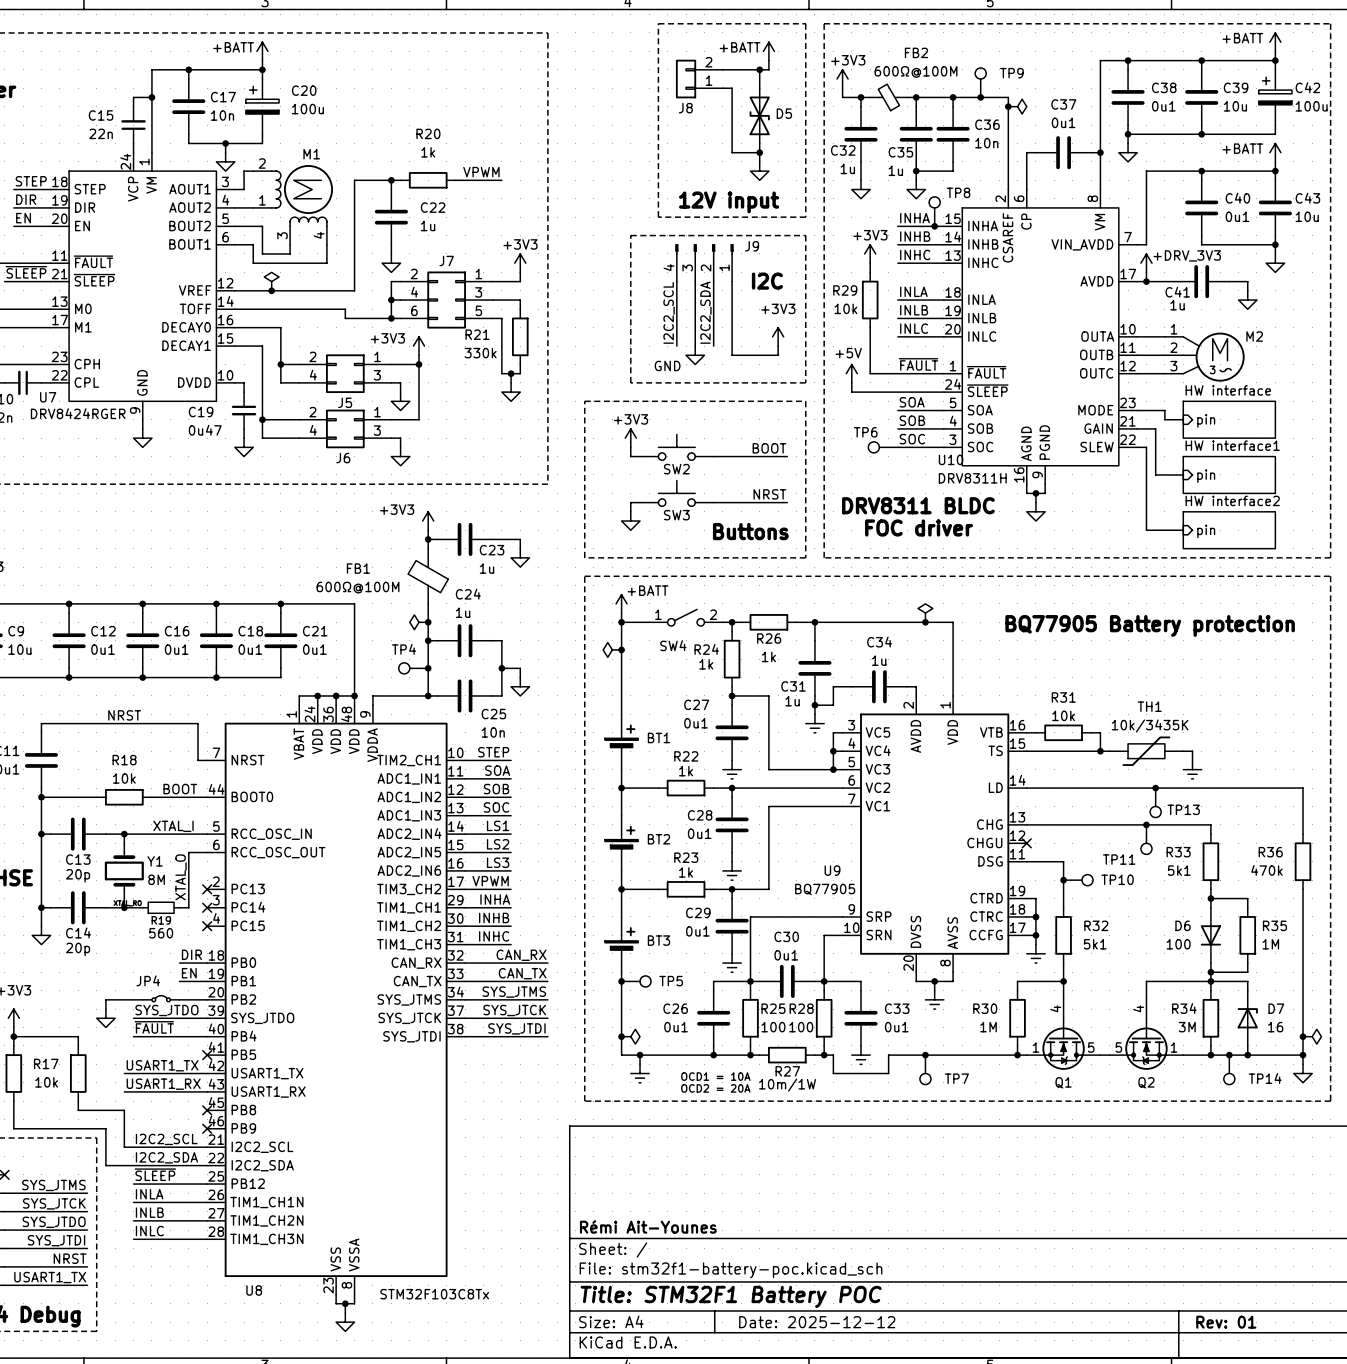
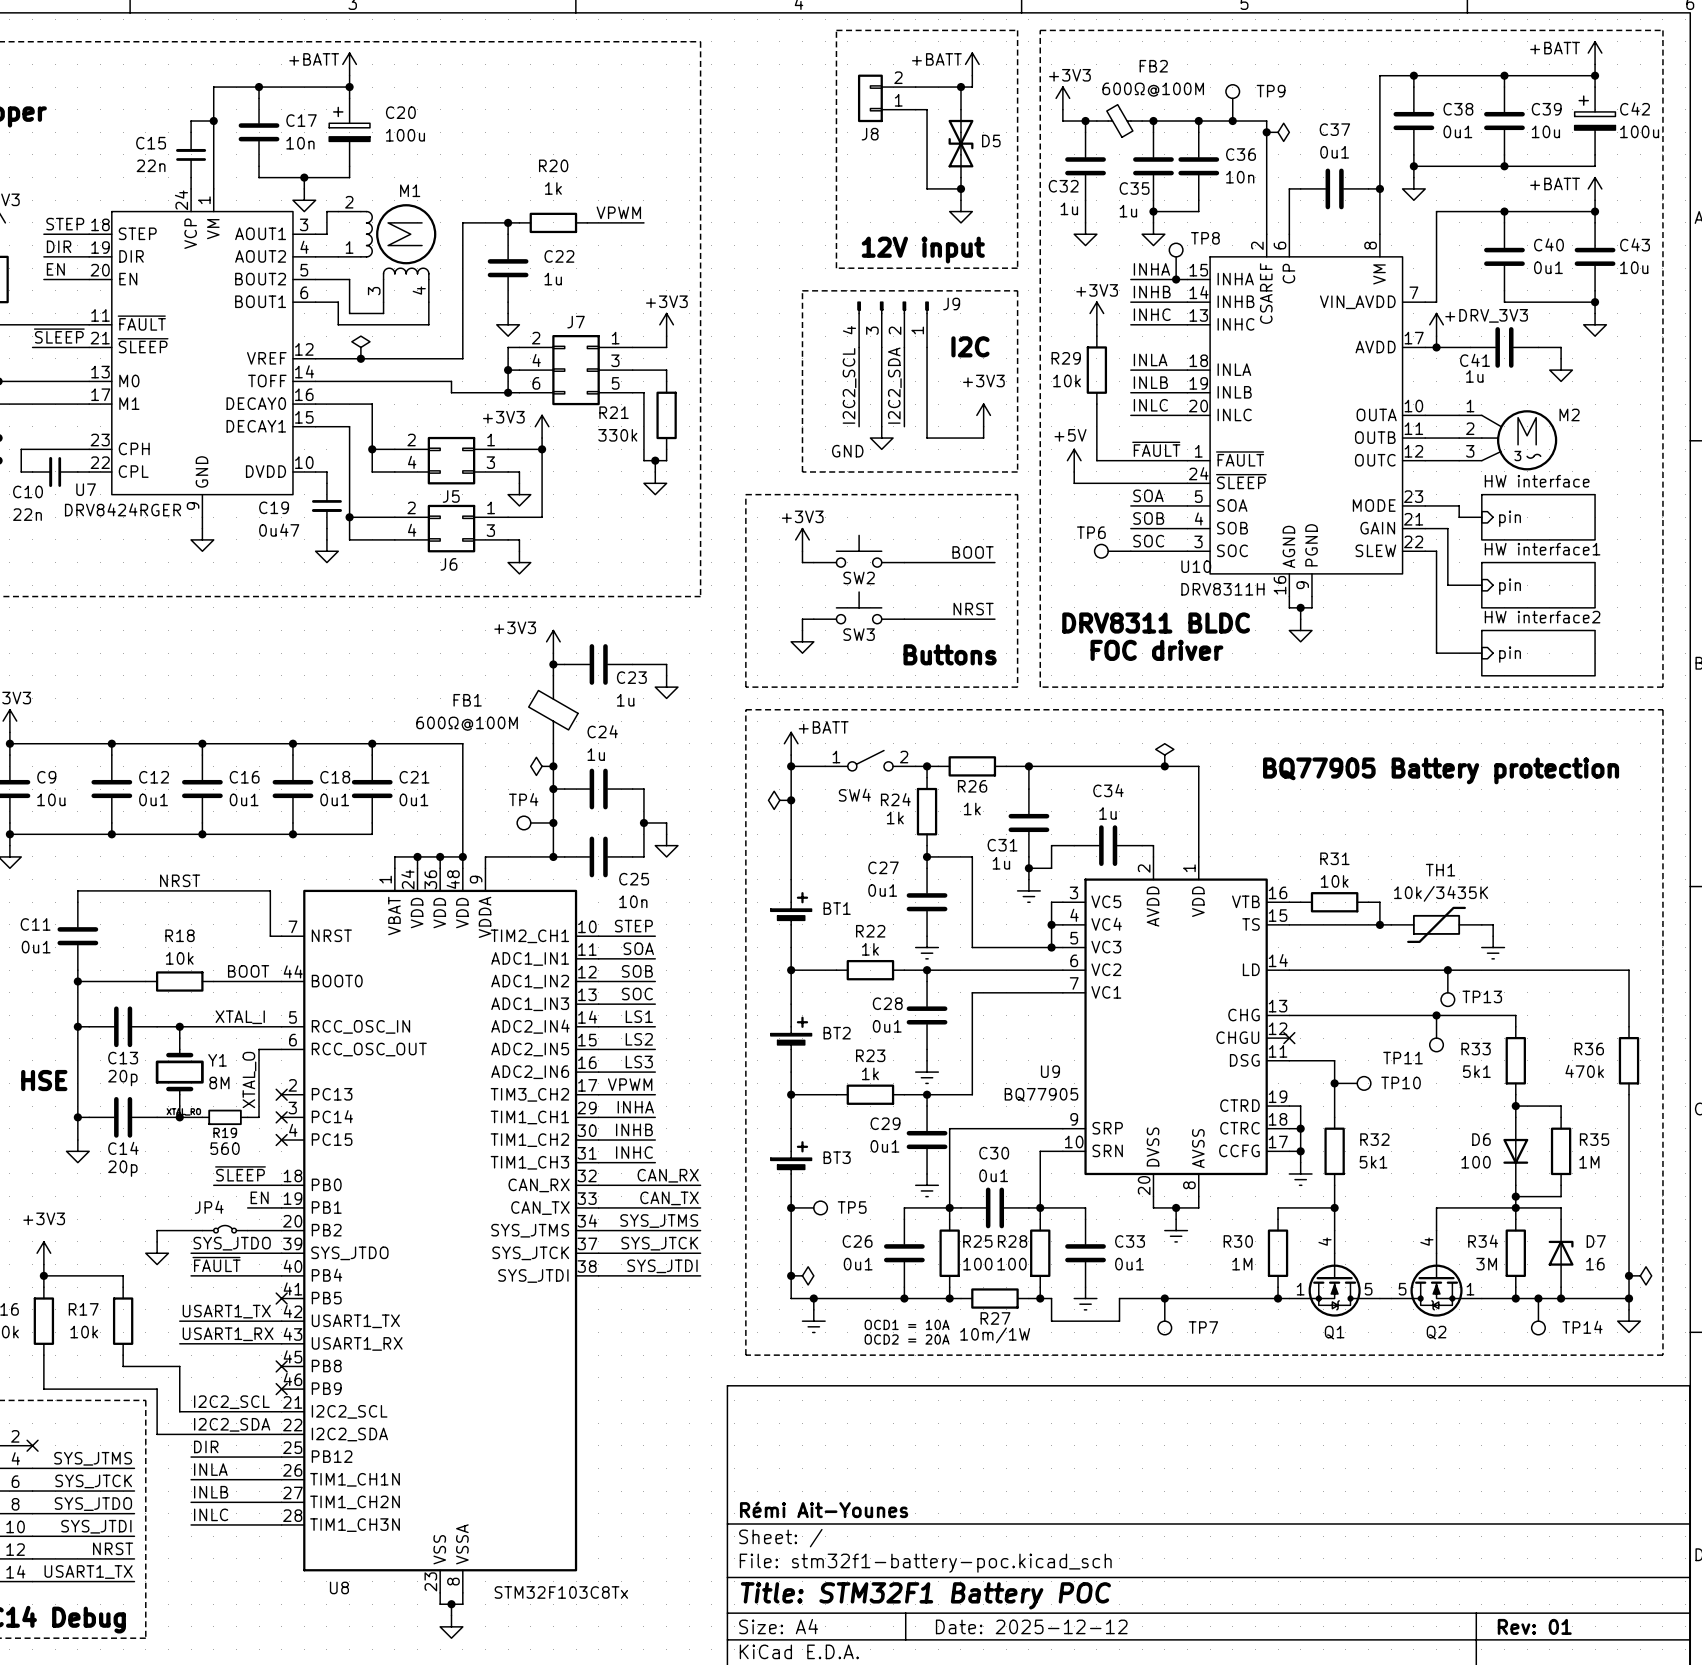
label: none -> ~{SLEEP} (240, 1173)
label: DIR (191, 954) -> none
wire: none -> (213, 1185) (247, 1185)
label: ~{SLEEP} (155, 1174) -> DIR (206, 1446)

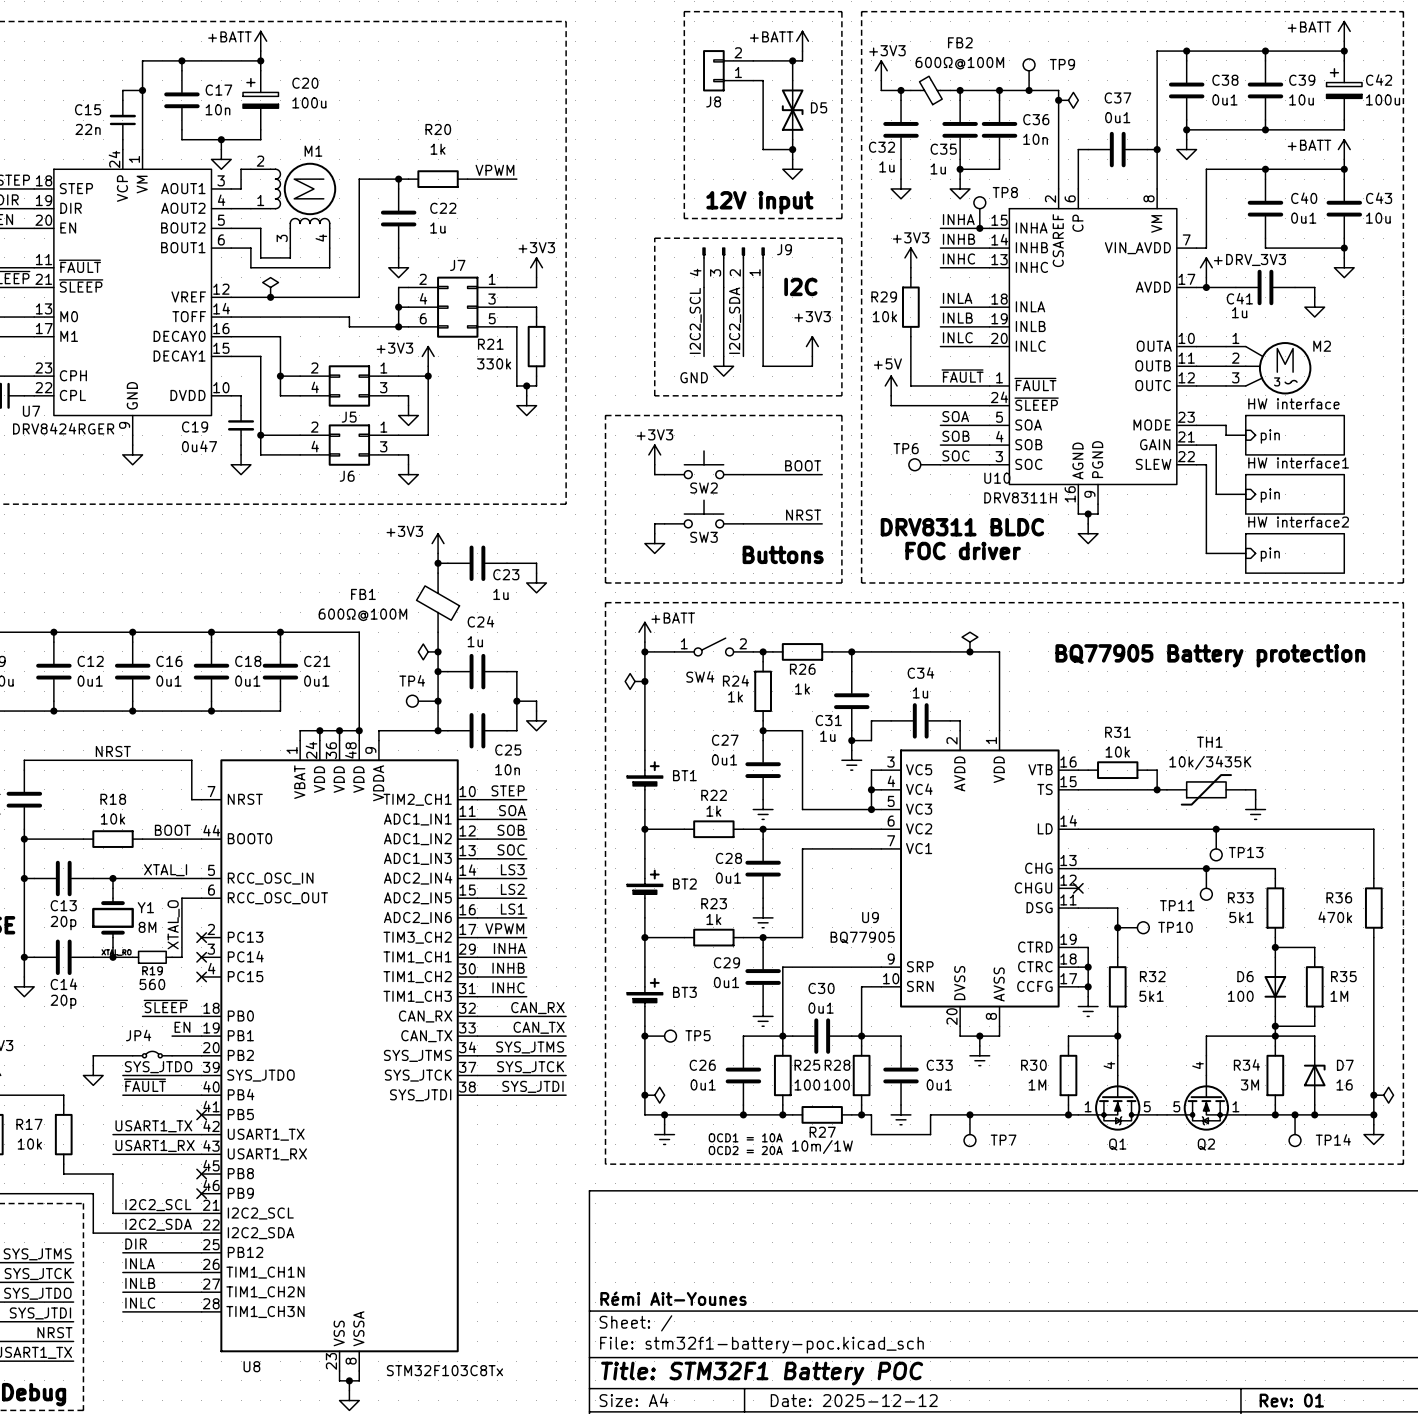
label: LS1 (639, 1016) -> LS3 (512, 869)
label: LS3 (639, 1061) -> LS1 (512, 909)

